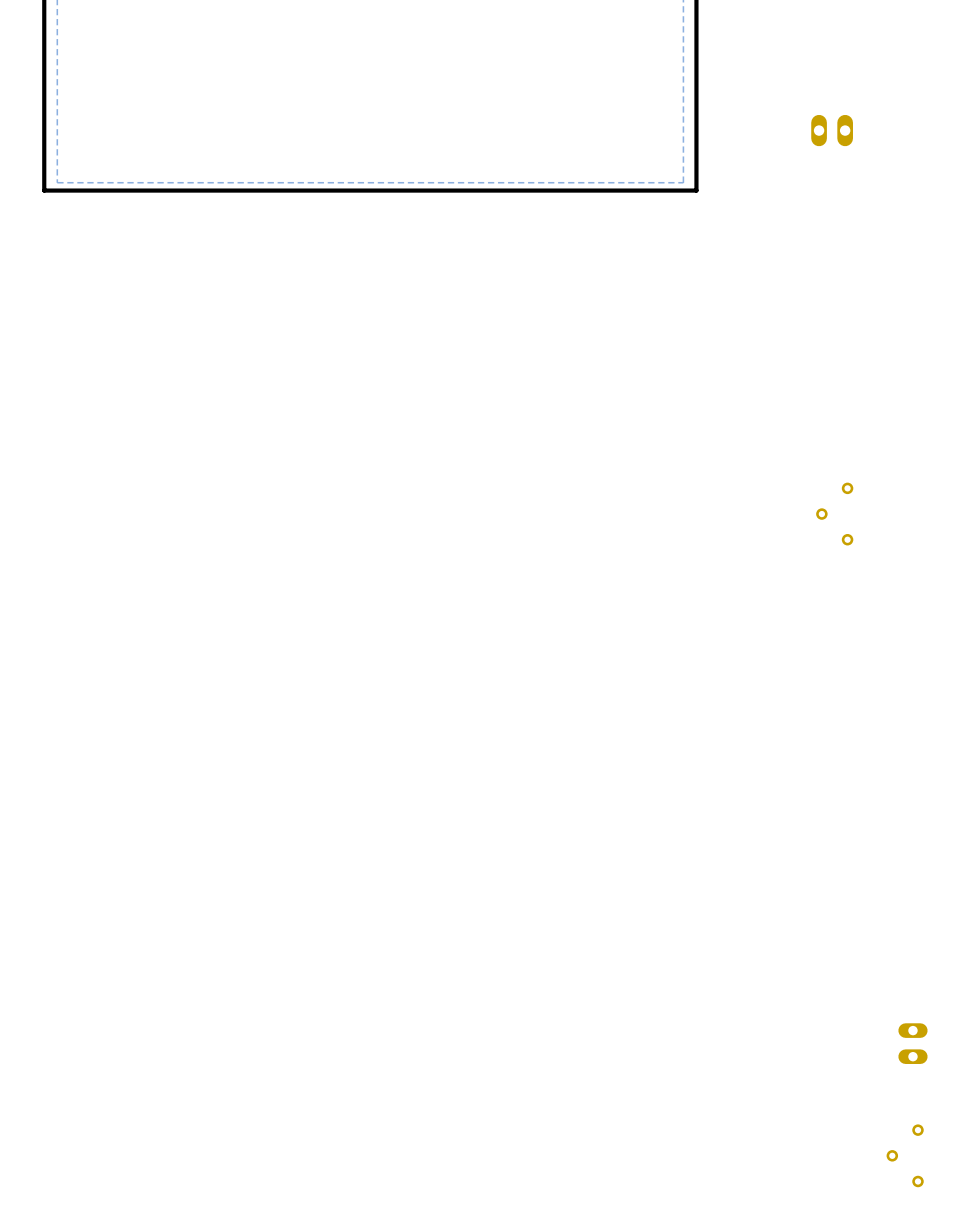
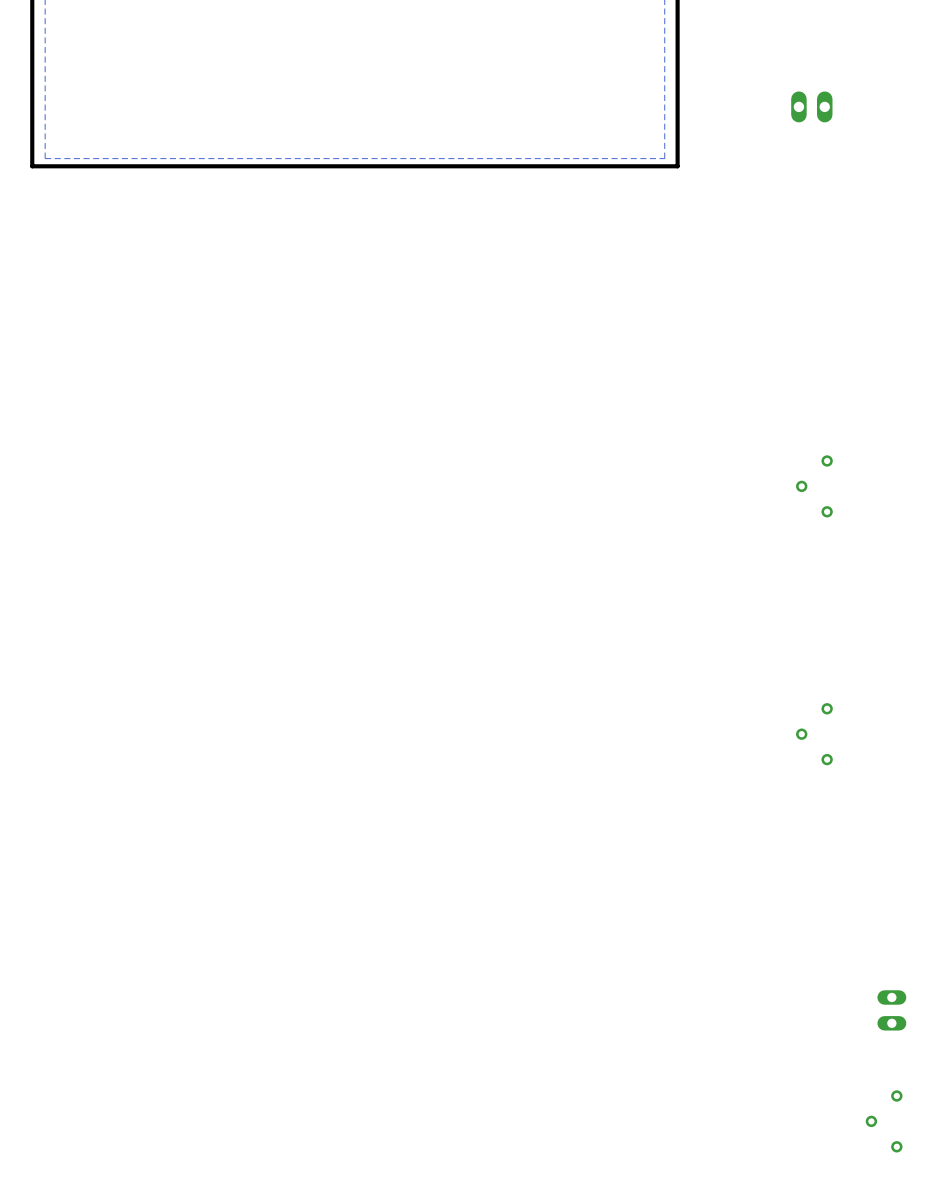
part: none -> (814, 734)

